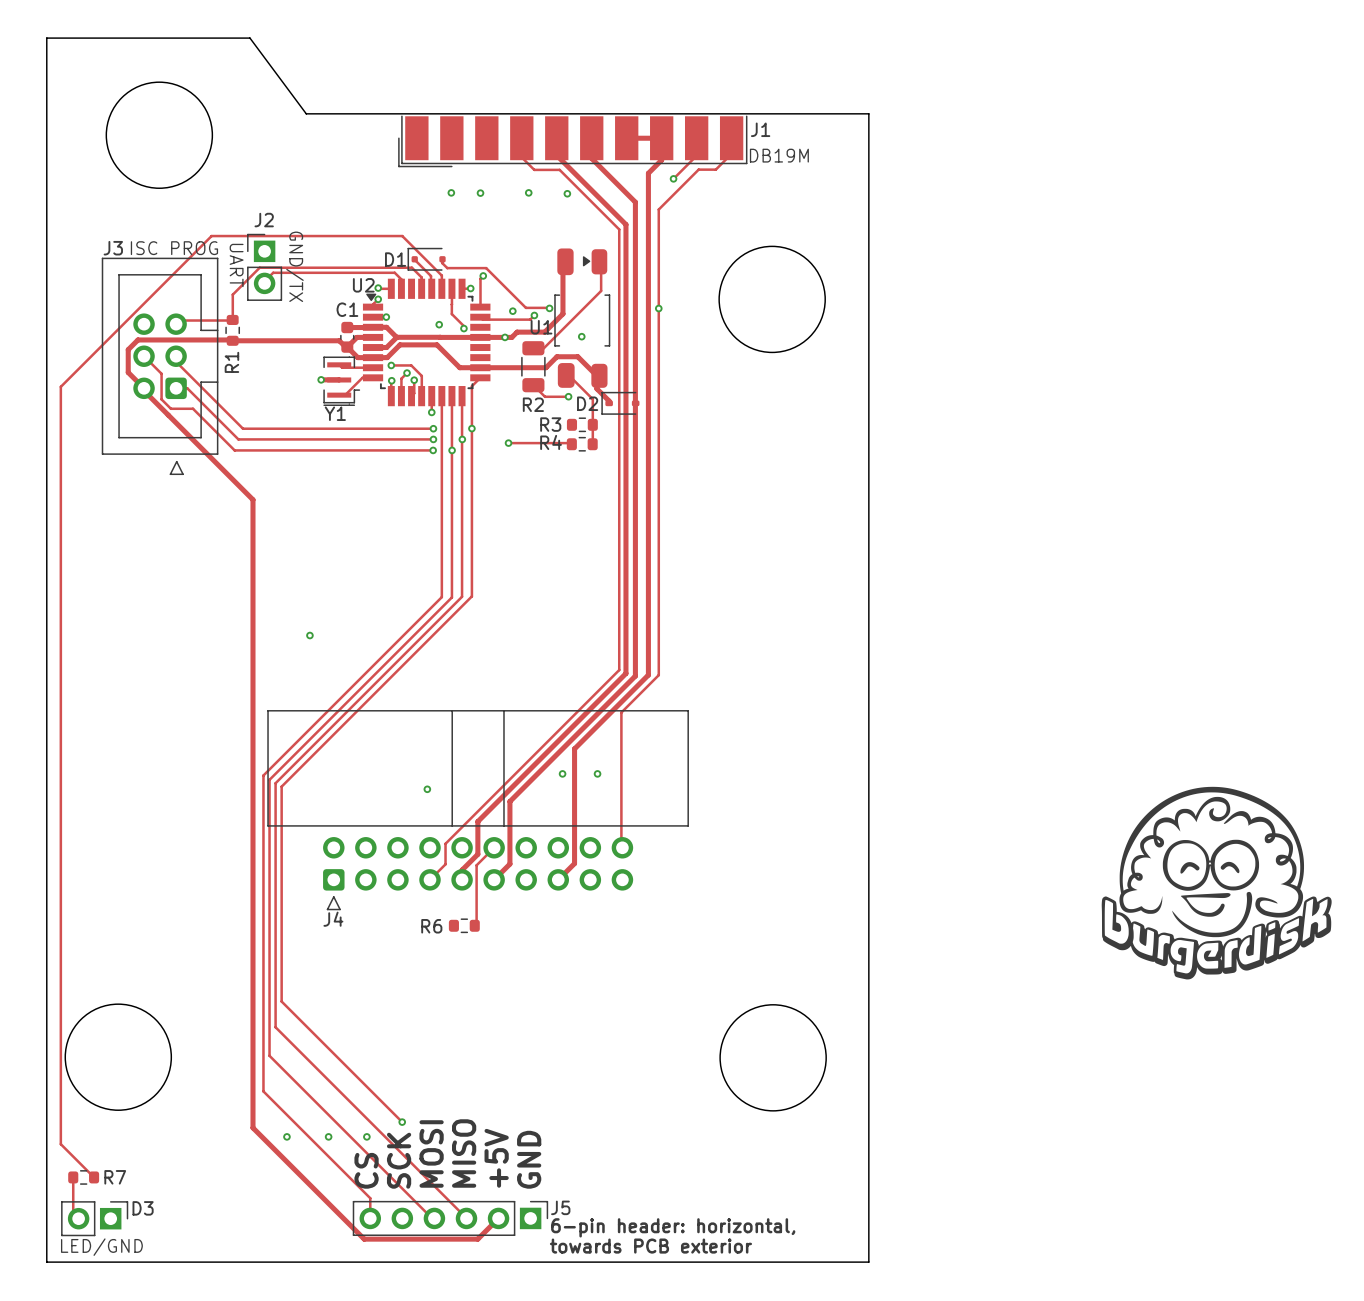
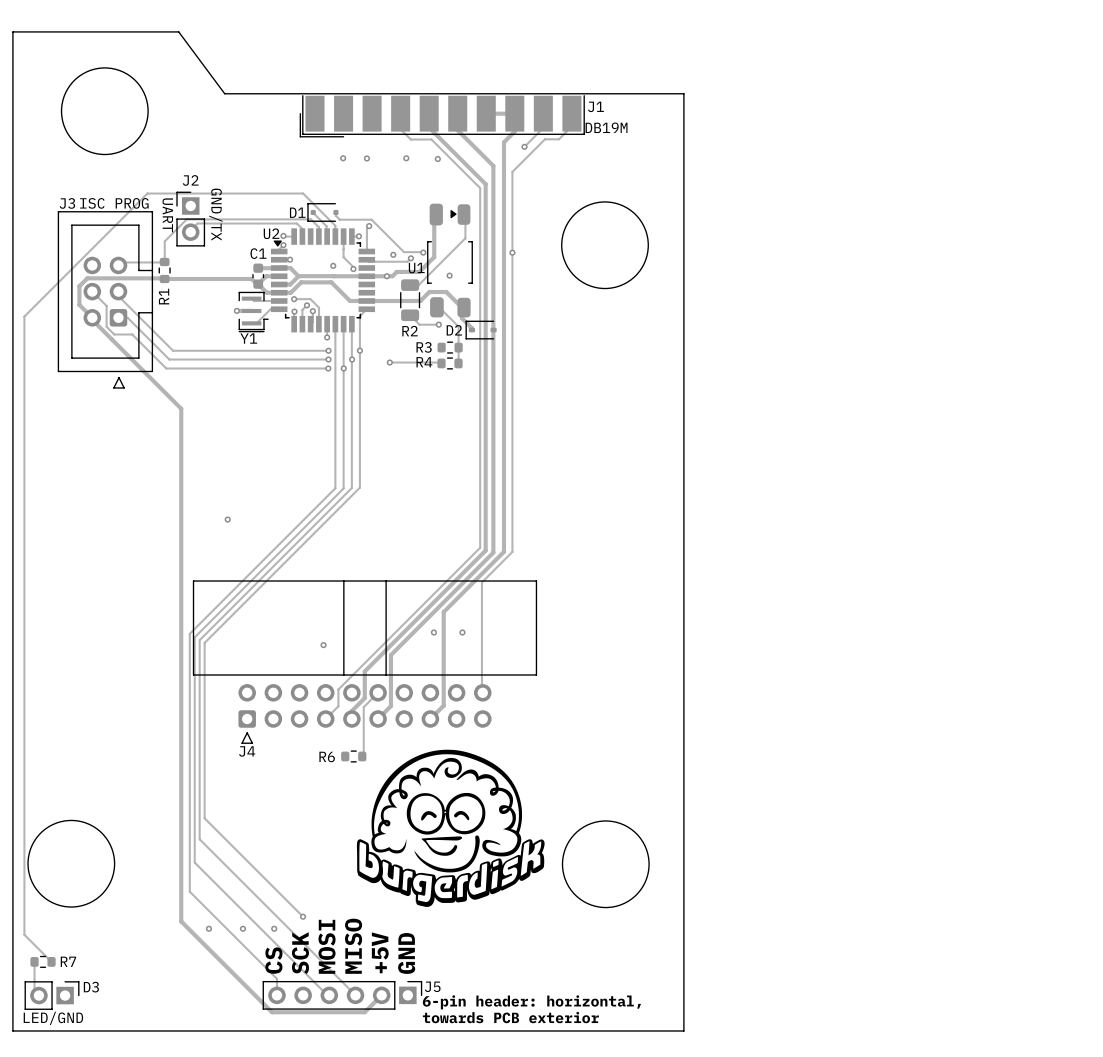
drawing: [1101, 786, 1332, 980] -> none
drawing: none -> [356, 749, 545, 907]

